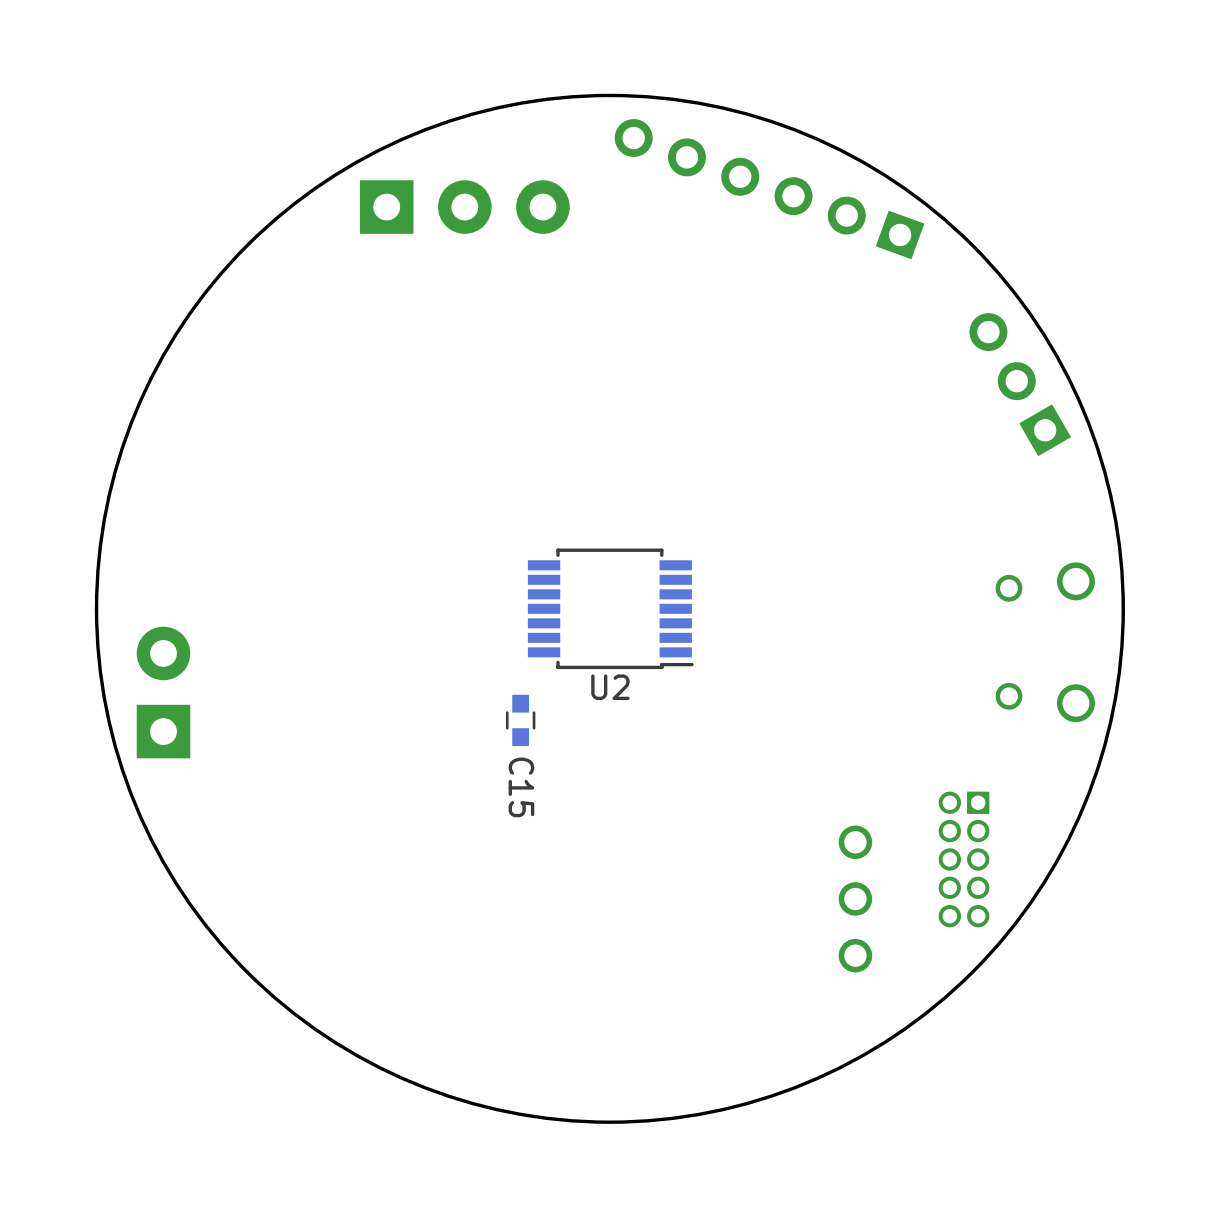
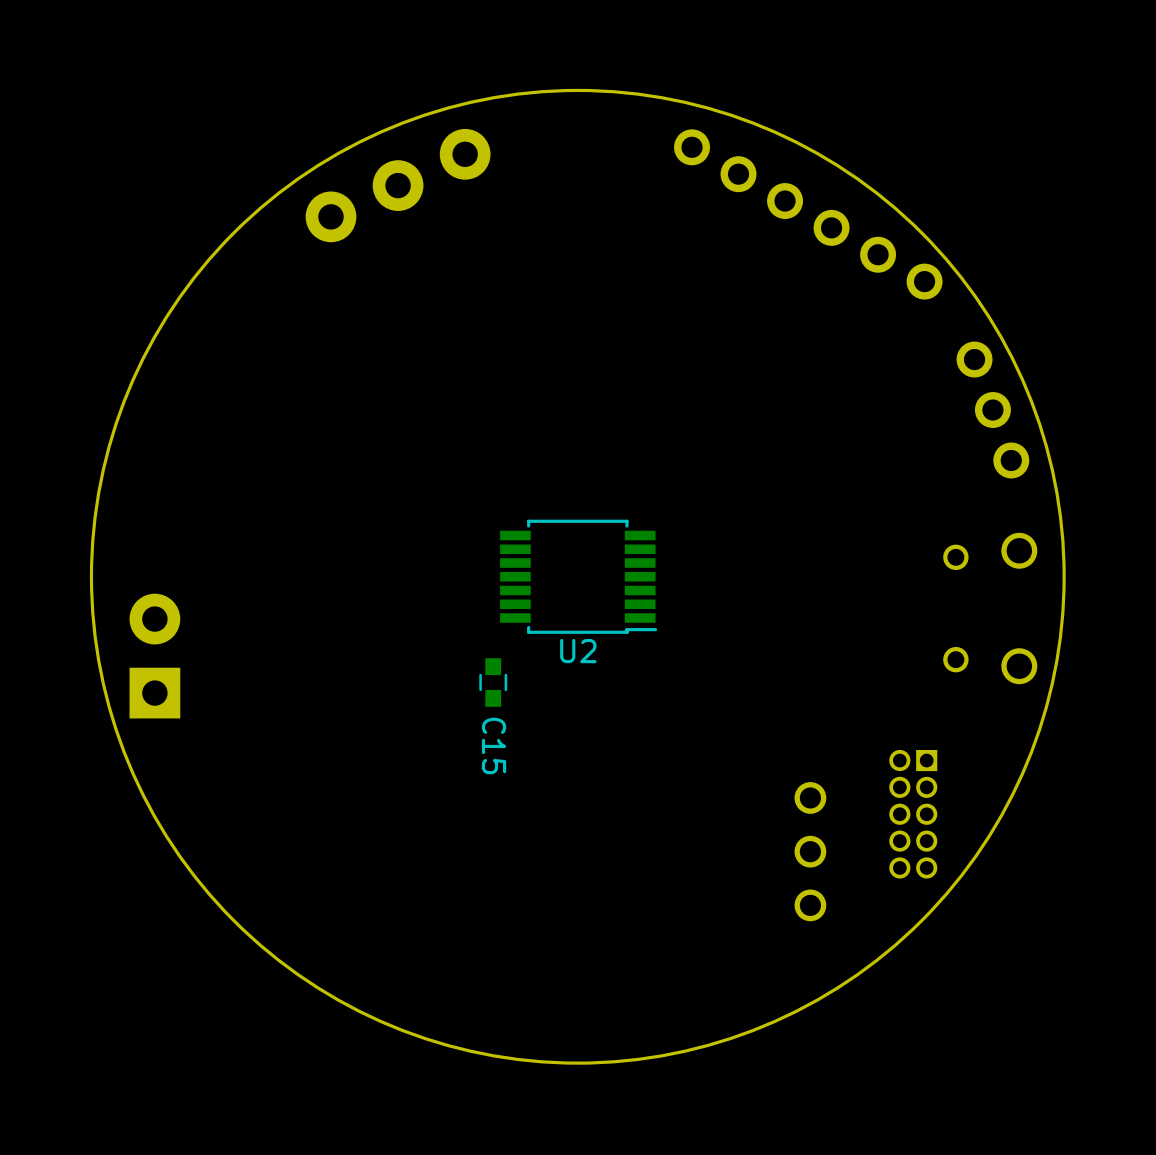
part: (769, 189) -> none
part: none -> (398, 185)
part: (464, 207) -> none
part: none -> (808, 214)
part: (1020, 384) -> none
part: none -> (992, 410)

